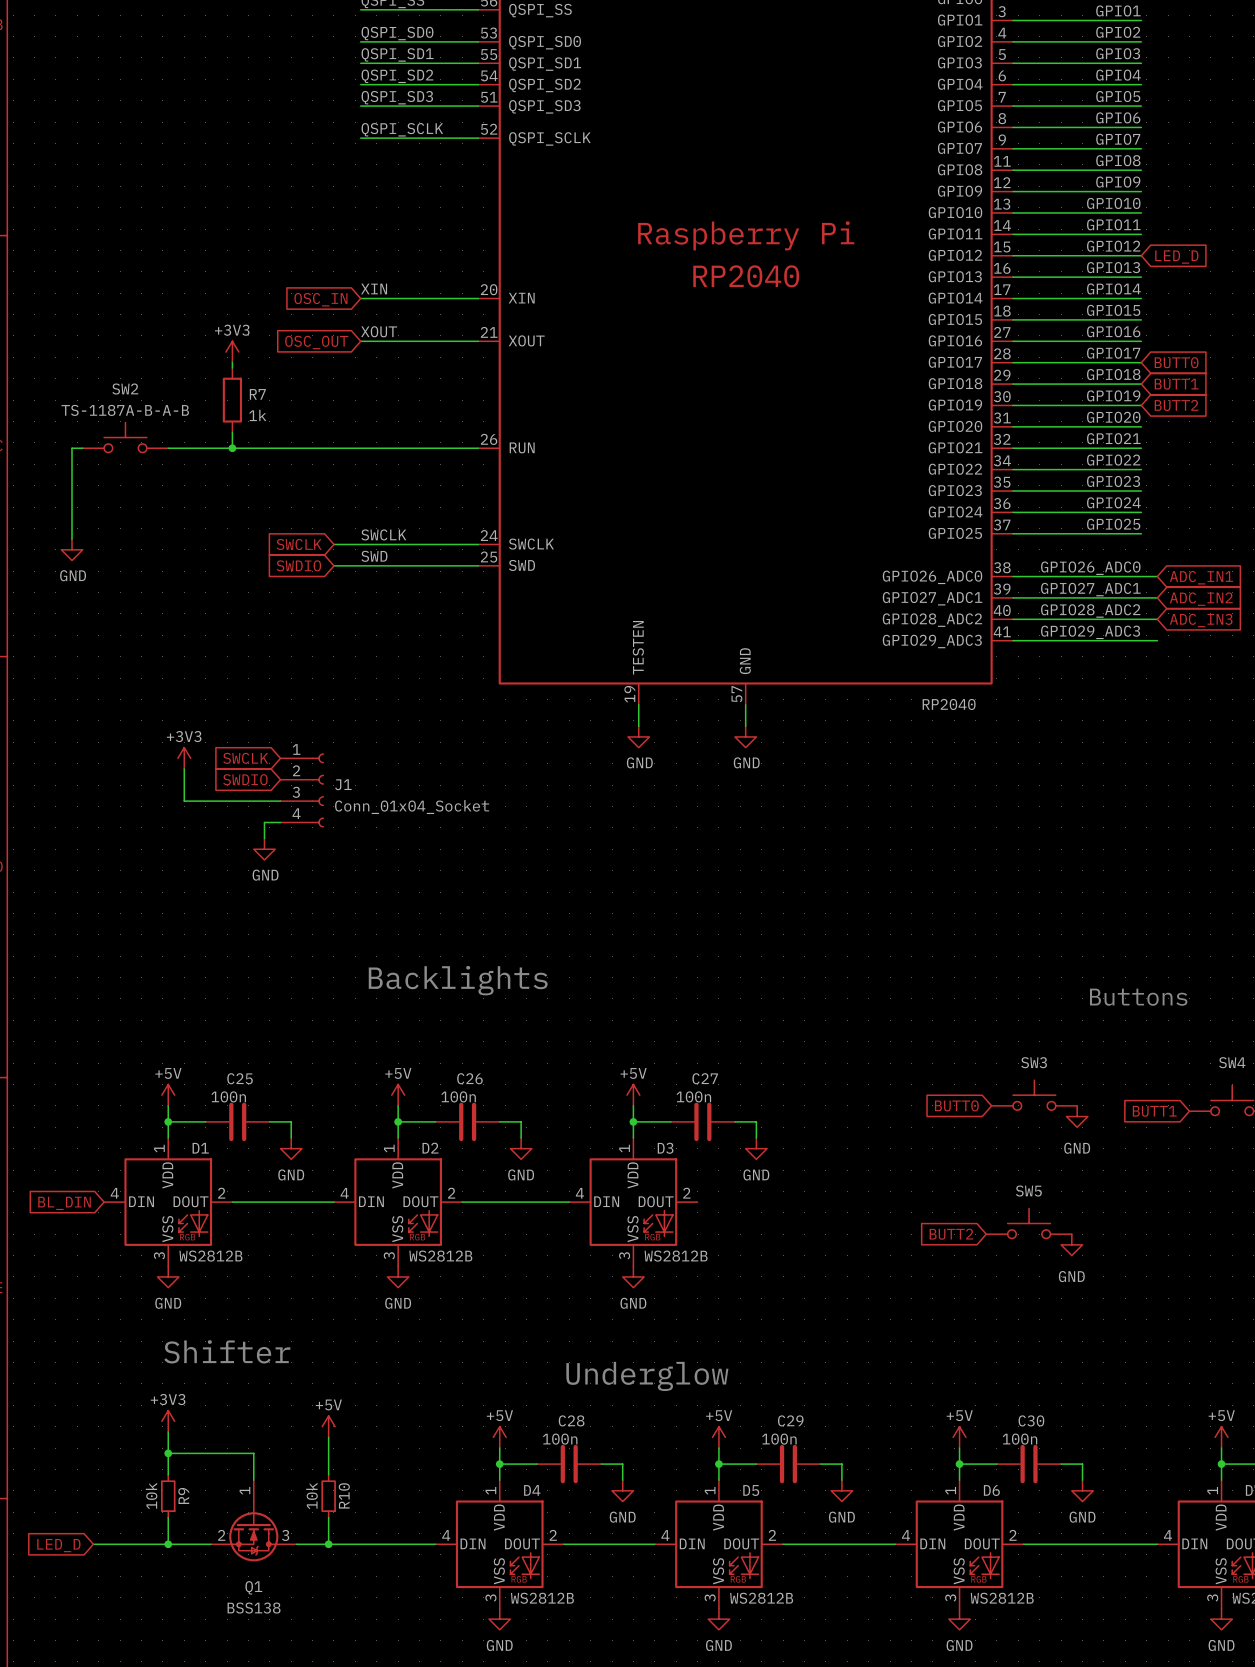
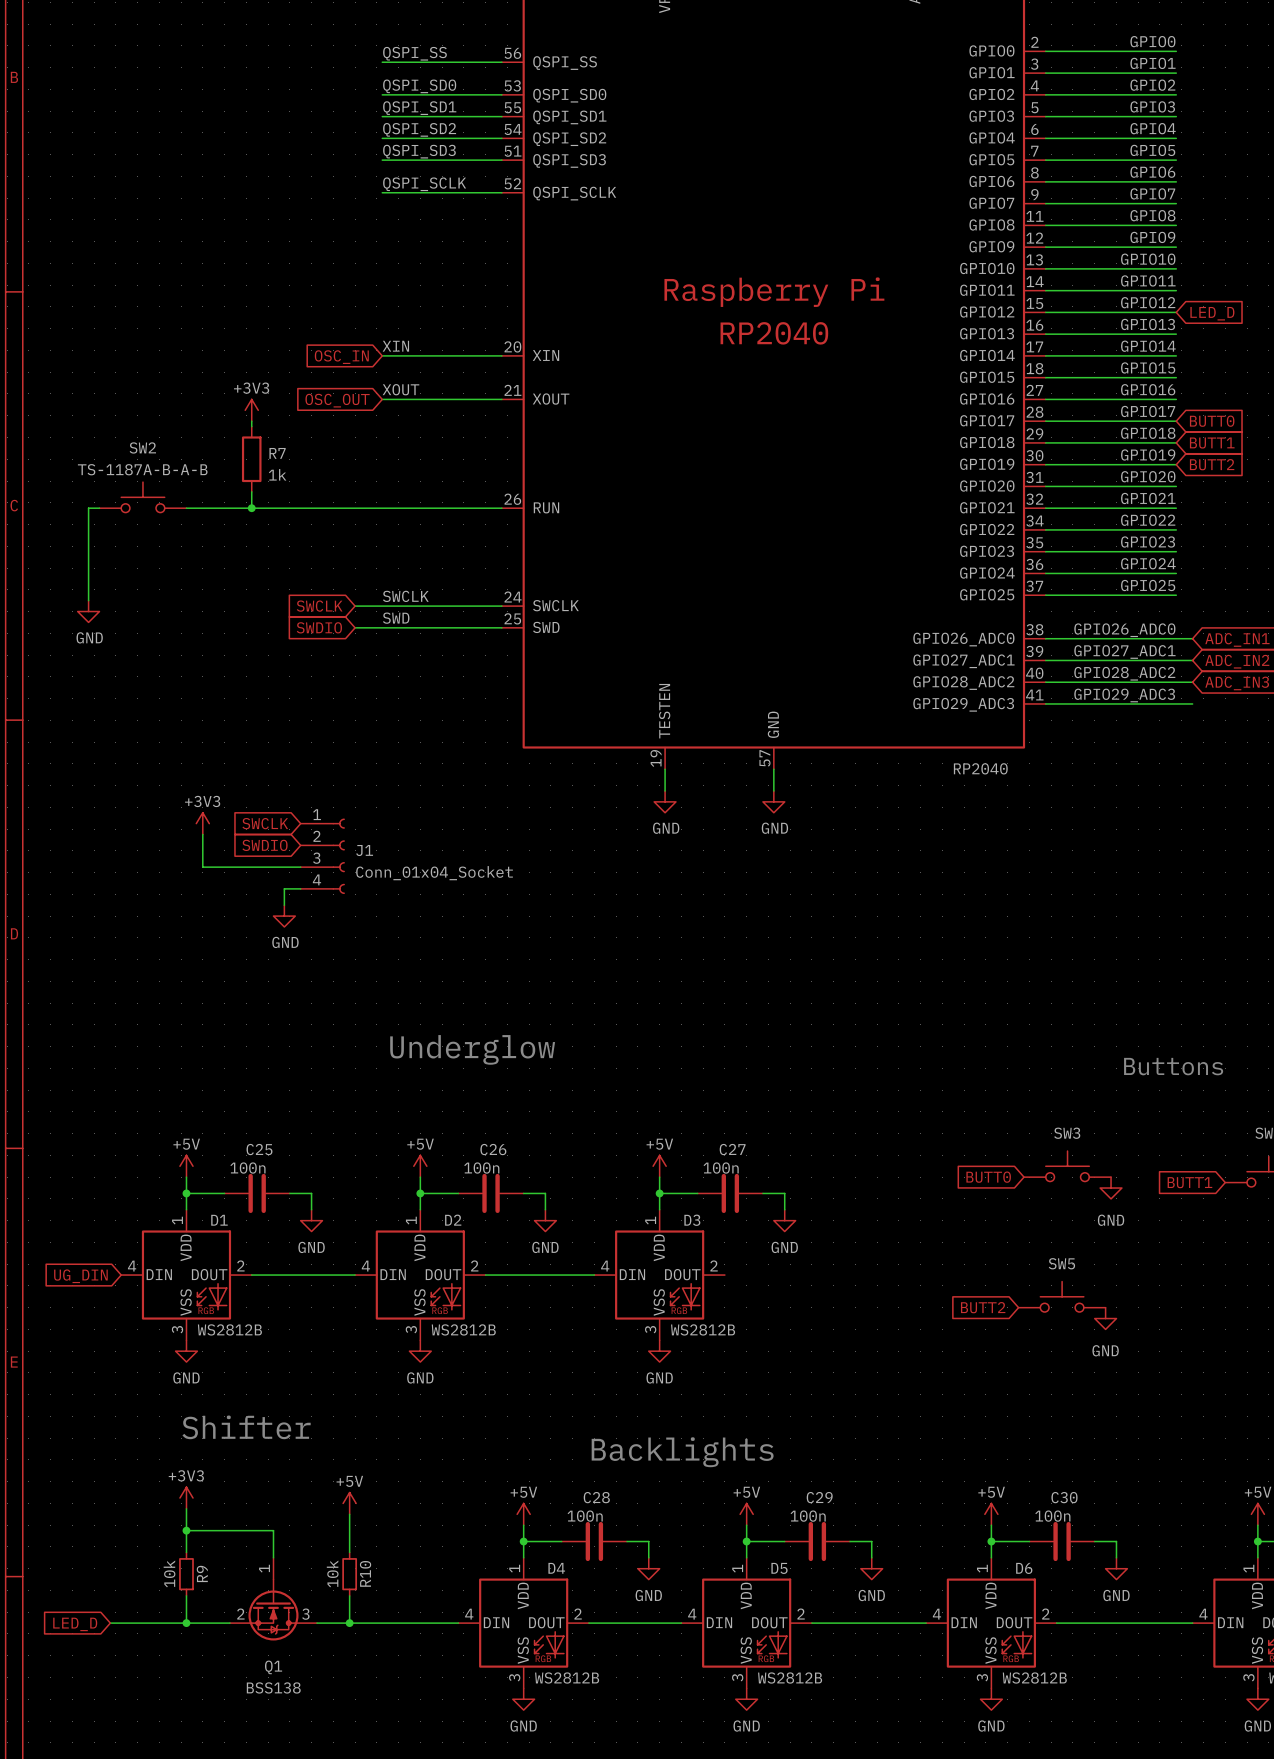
text: Backlights (458, 980) -> Underglow (472, 1049)
global label: BL_DIN (64, 1203) -> UG_DIN (80, 1276)
text: Underglow (647, 1376) -> Backlights (682, 1452)

